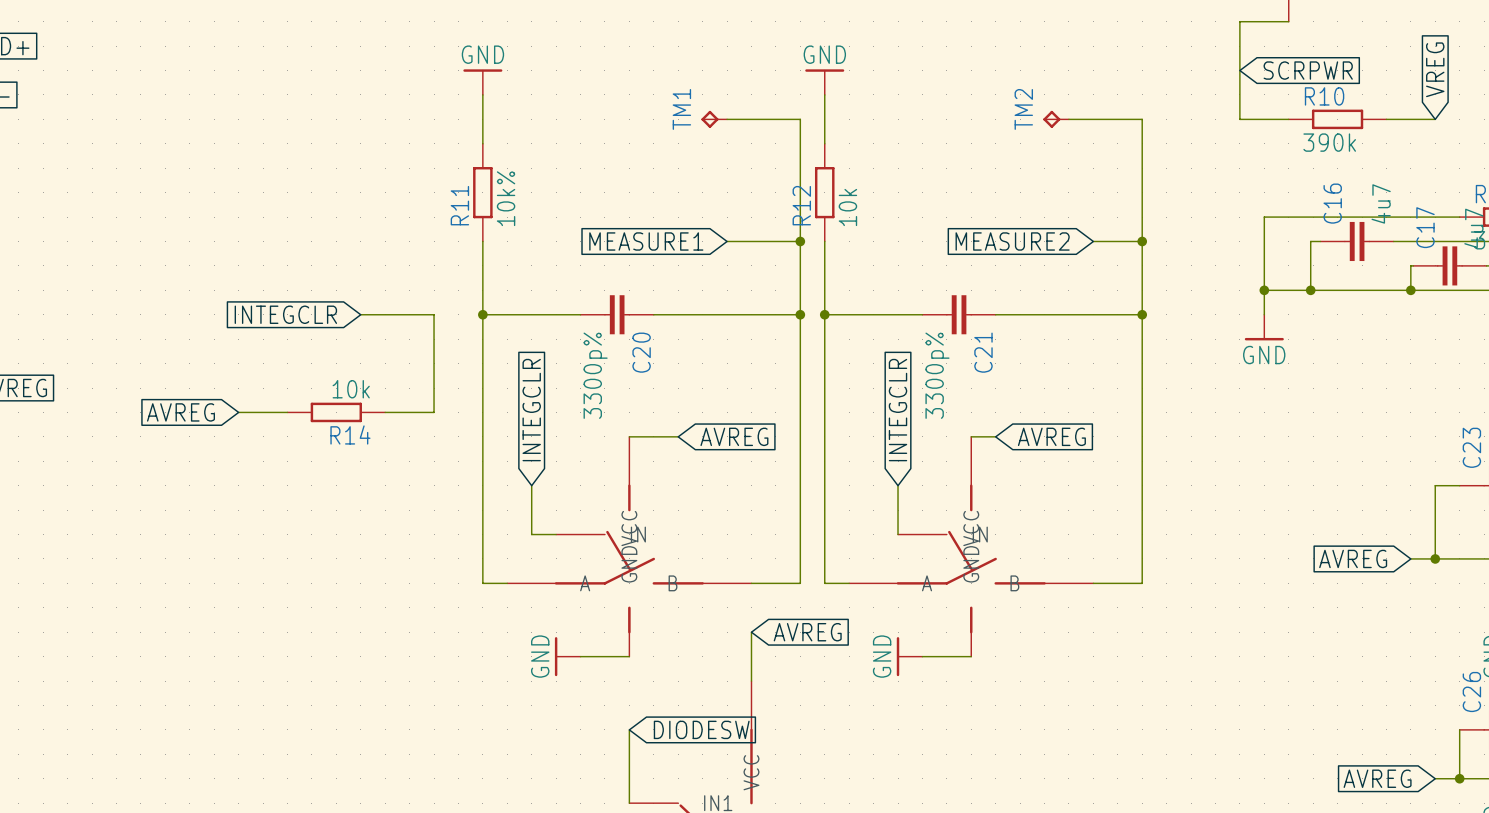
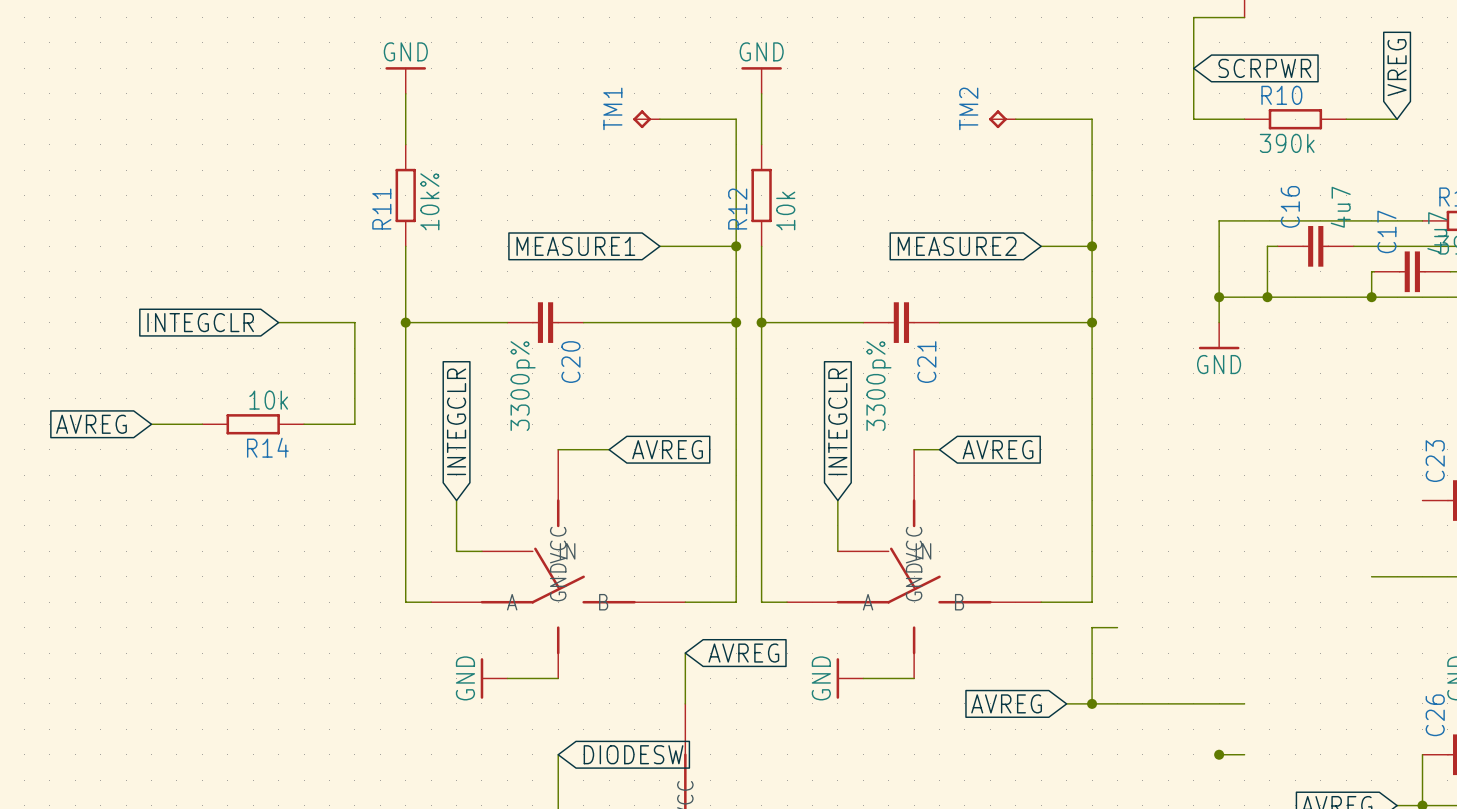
wire: (1459, 485) (1435, 485) (1435, 558) -> none
global label: AVREG (1353, 558) -> none
junction: (1435, 558) -> none
wire: none -> (1117, 627) (1092, 627) (1092, 703)
global label: none -> AVREG (1006, 703)
wire: none -> (1066, 703) (1244, 703)
junction: none -> (1092, 703)
wire: none -> (1219, 754) (1244, 754)
junction: none -> (1219, 754)

